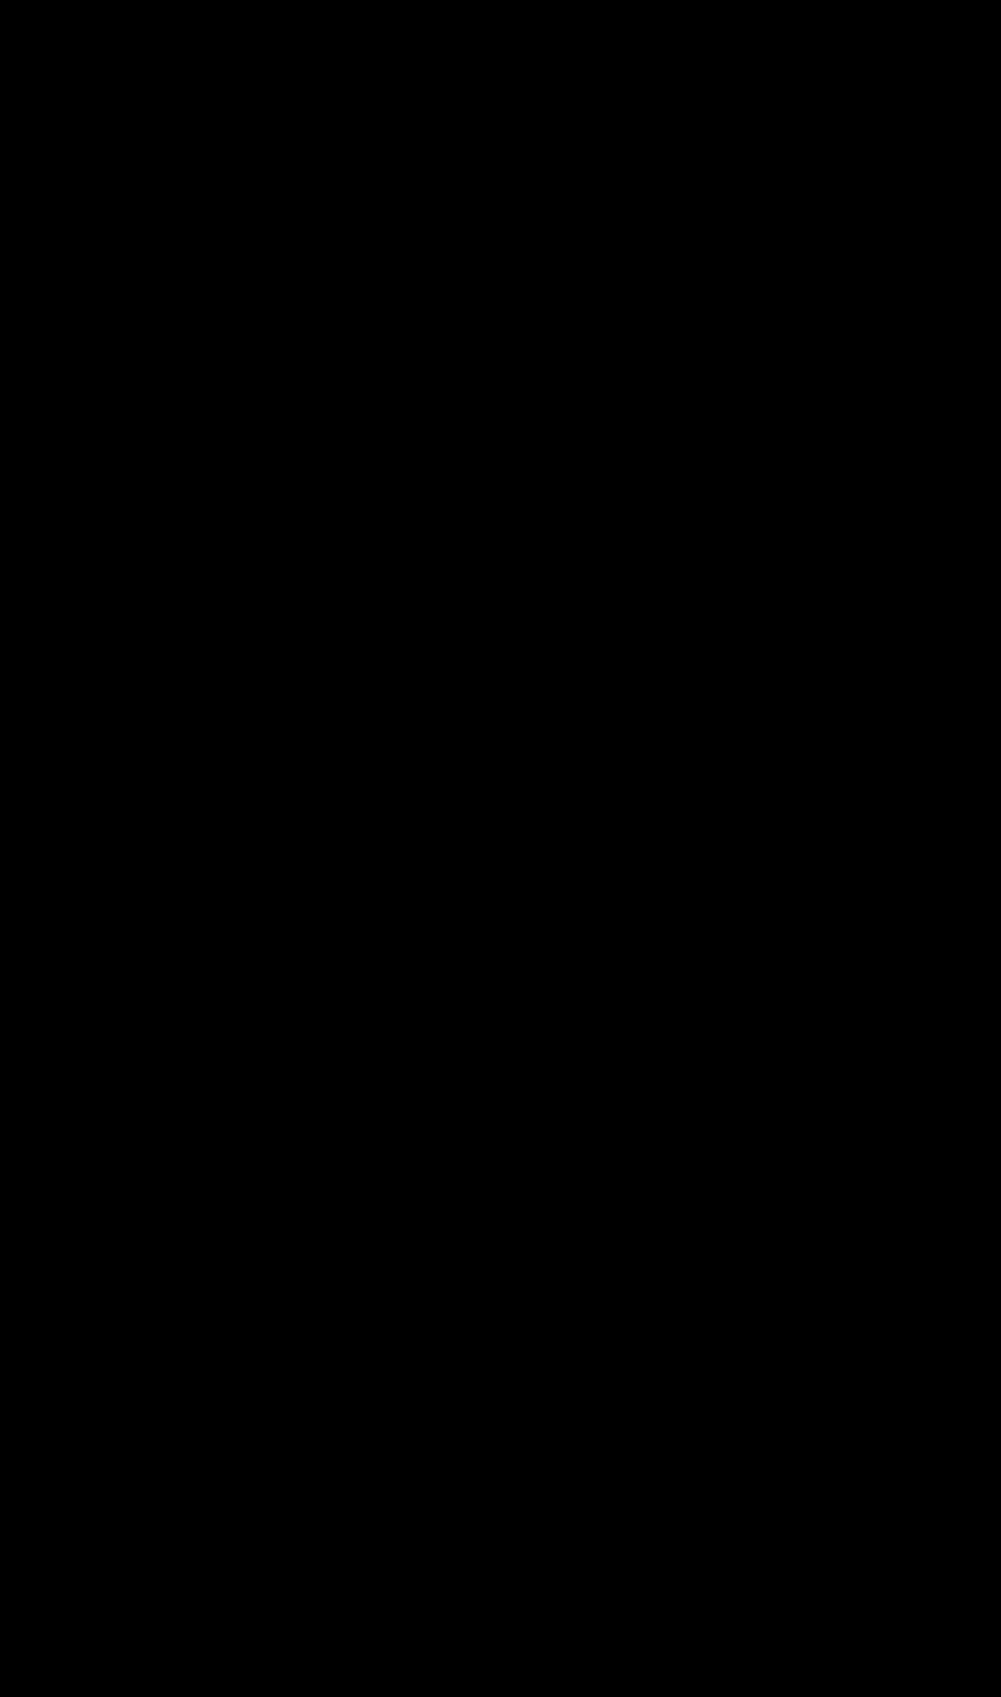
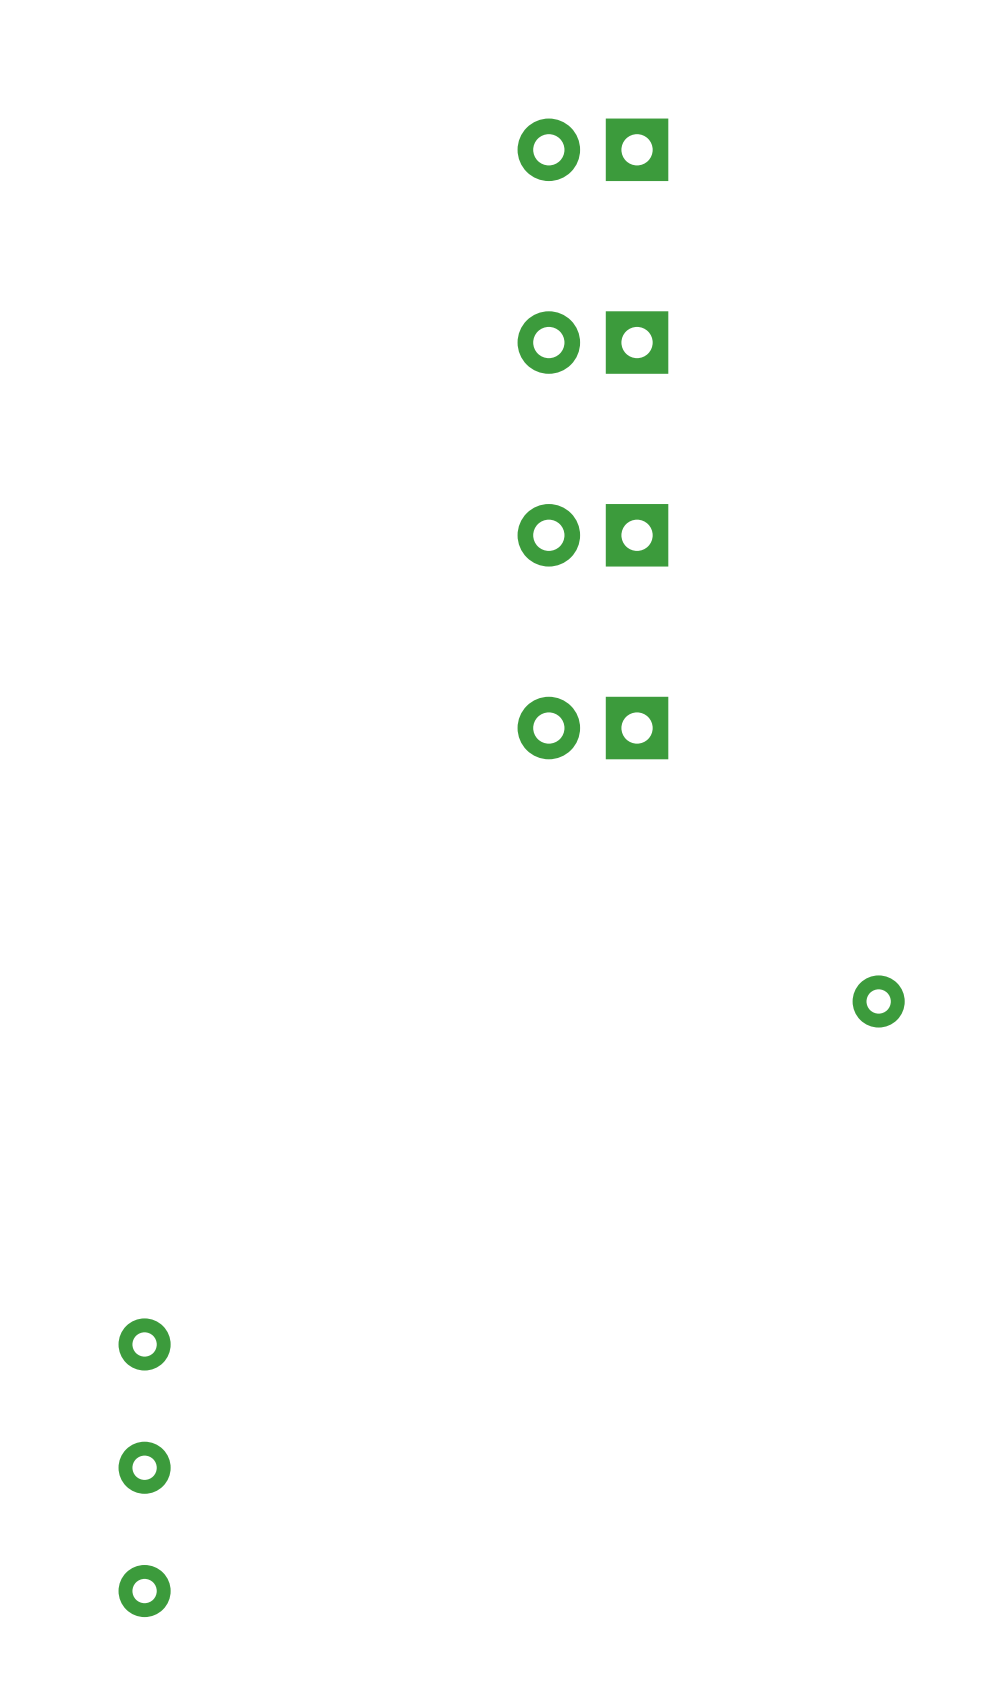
part: none -> (592, 149)
part: none -> (592, 342)
part: none -> (592, 535)
part: none -> (592, 728)
part: none -> (878, 1001)
part: none -> (144, 1344)
part: none -> (144, 1467)
part: none -> (144, 1591)

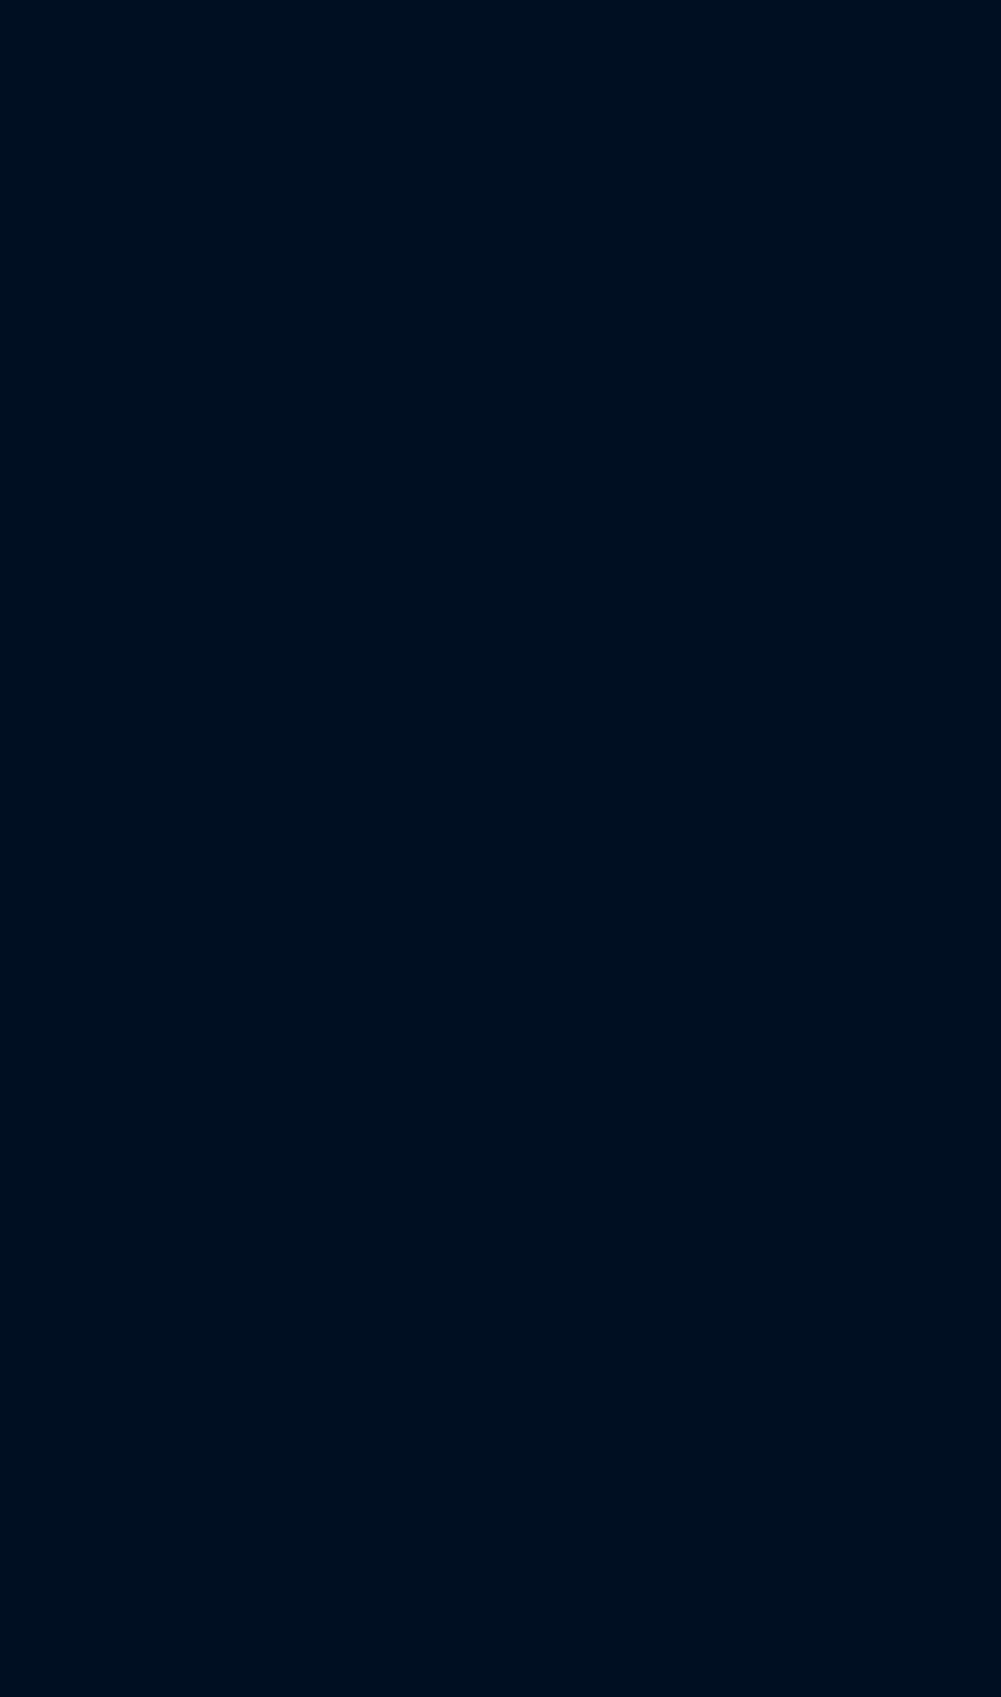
part: (592, 149) -> none
part: (592, 342) -> none
part: (592, 535) -> none
part: (592, 728) -> none
part: (878, 1001) -> none
part: (144, 1344) -> none
part: (144, 1467) -> none
part: (144, 1591) -> none

